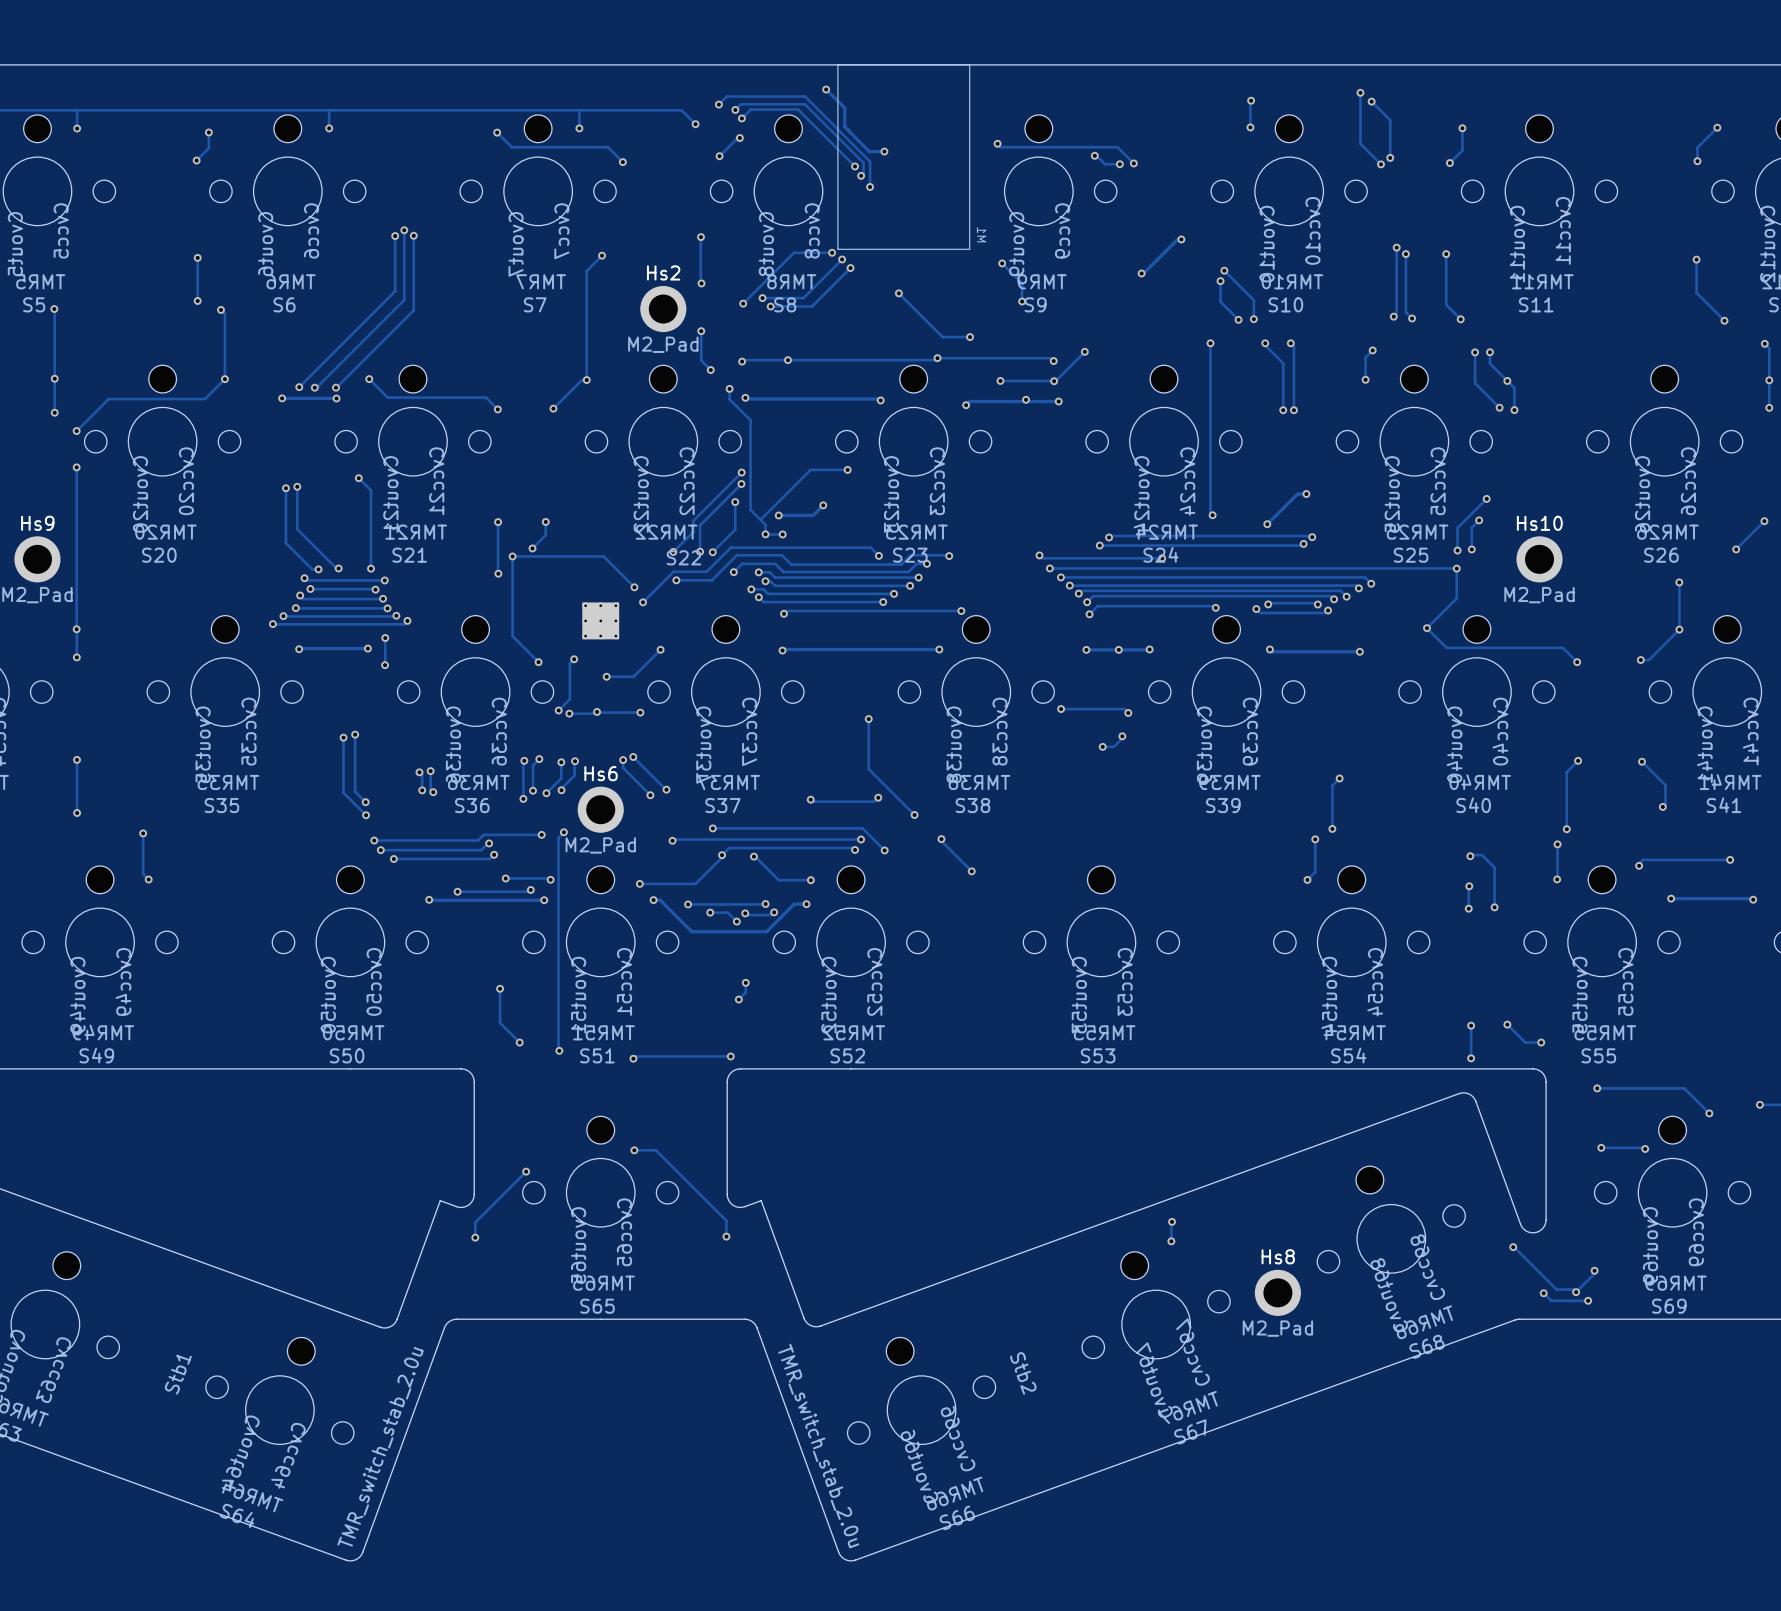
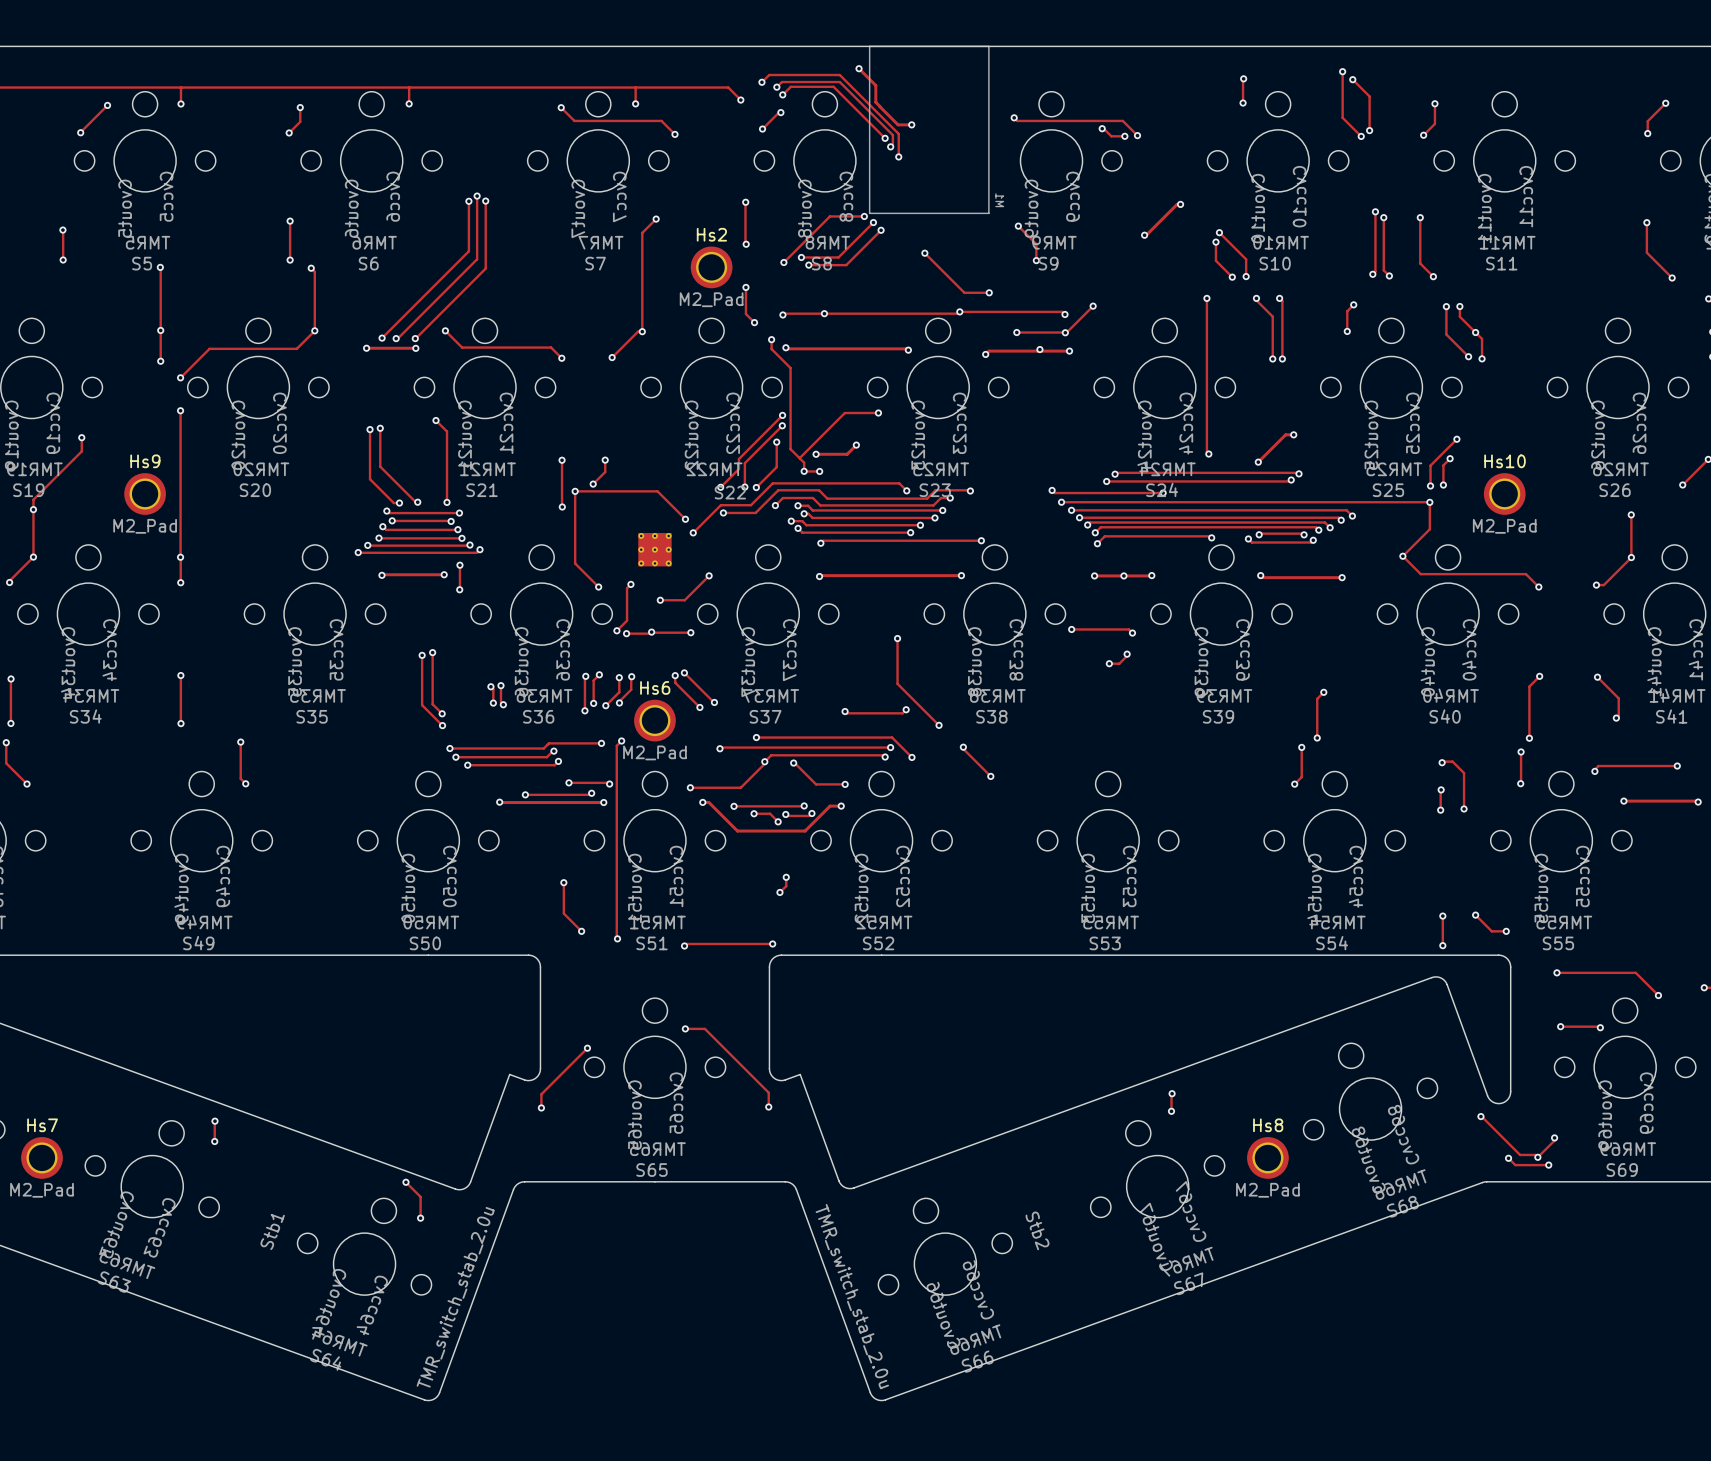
track: none -> (214, 1121) (214, 1141)
via: none -> (214, 1121)
via: none -> (214, 1141)
track: none -> (405, 1182) (420, 1196) (420, 1218)
via: none -> (405, 1182)
via: none -> (420, 1218)

